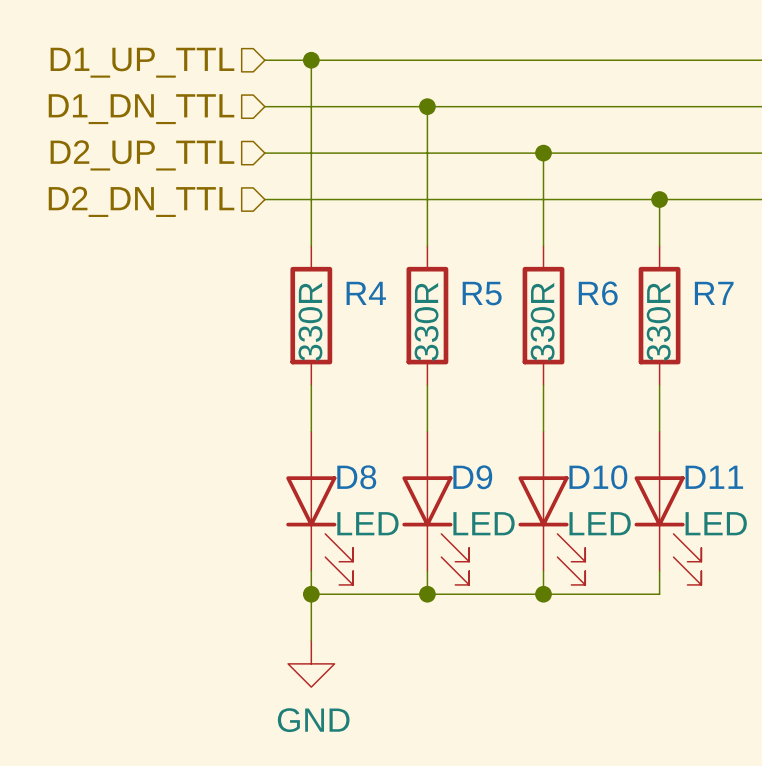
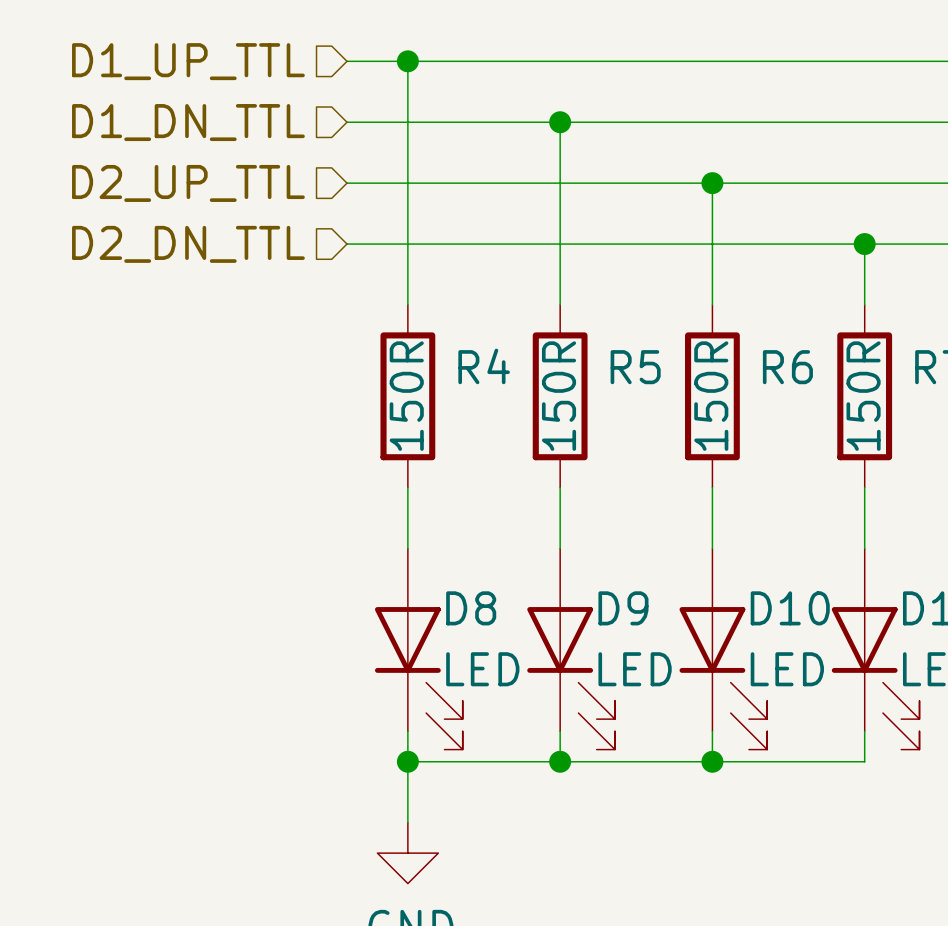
R4 value: 330R (310, 321) -> 150R (406, 396)
R5 value: 330R (426, 321) -> 150R (559, 396)
R6 value: 330R (542, 321) -> 150R (711, 396)
R7 value: 330R (658, 321) -> 150R (863, 396)

